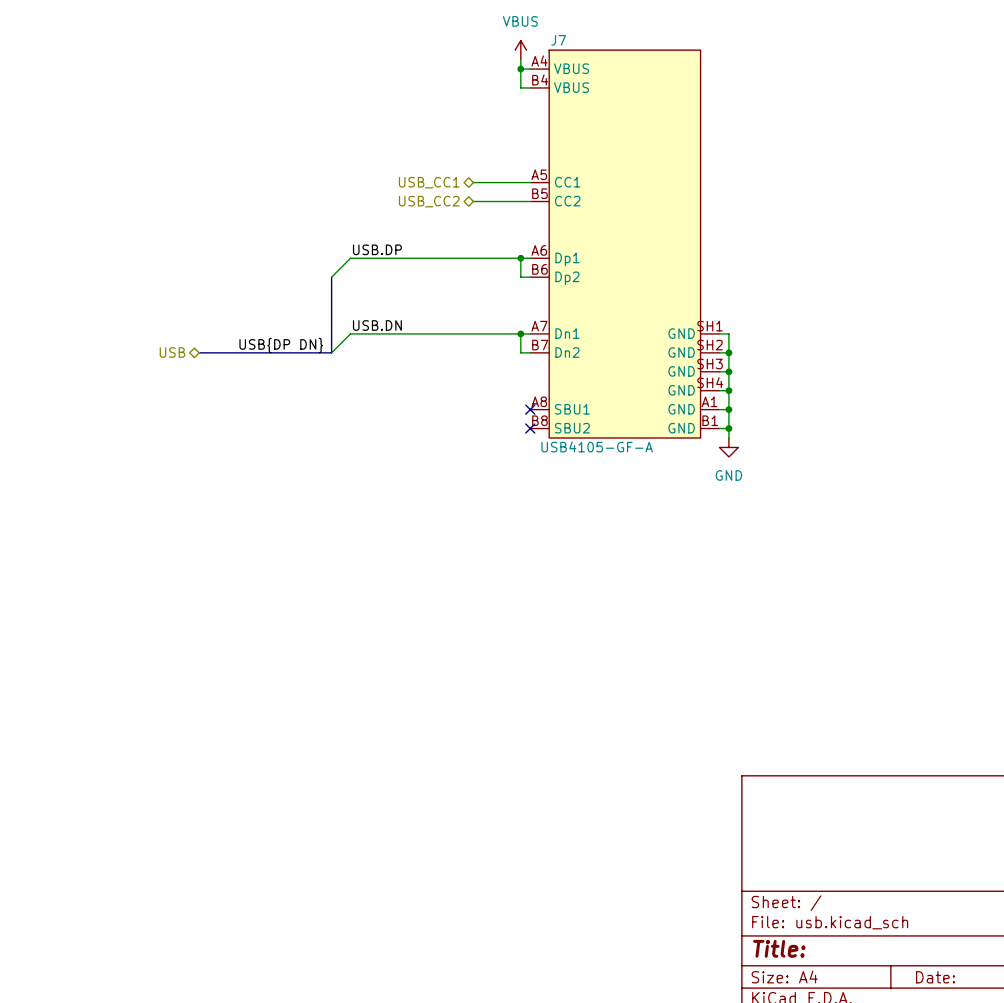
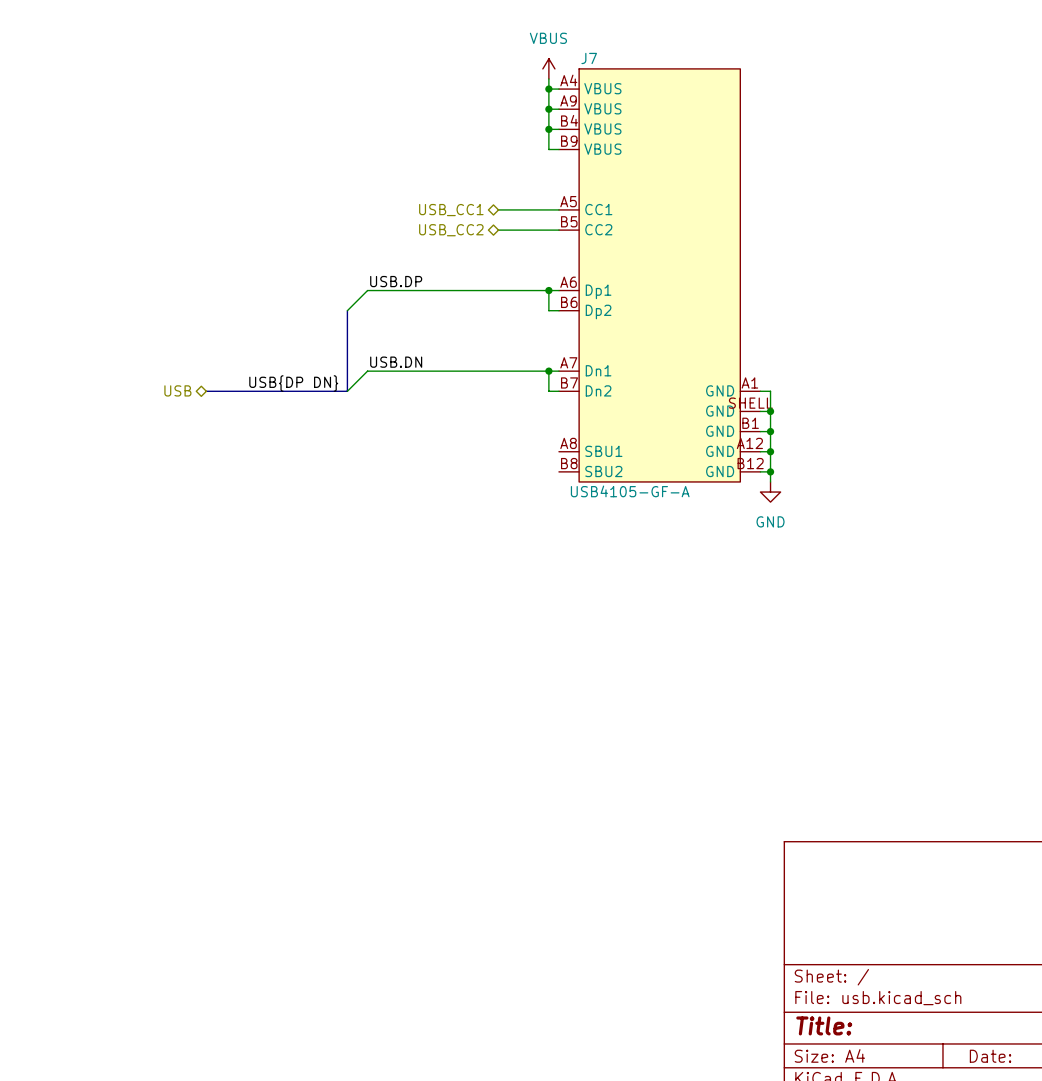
J7 symbol: [530, 50, 720, 439] -> [558, 68, 761, 482]
wire: none -> (548, 109) (548, 149) (558, 149)
junction: none -> (548, 109)
wire: none -> (548, 129) (558, 129)
junction: none -> (548, 129)
wire: (719, 333) (728, 333) (728, 352) -> none
junction: (728, 352) -> none
no-connect mark: (530, 409) -> none
no-connect mark: (530, 428) -> none

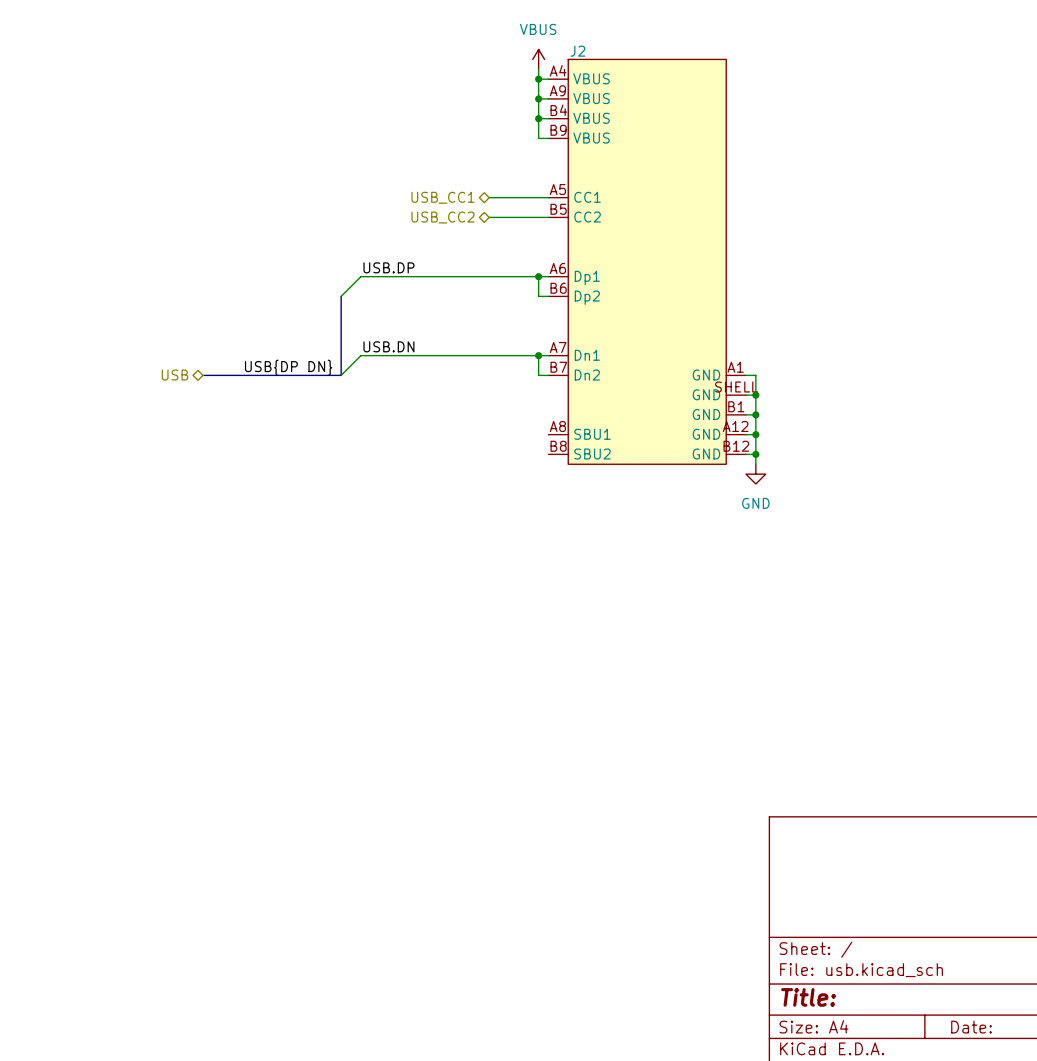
J7 name: J7 (589, 58) -> J2 (577, 51)
J7 value: USB4105-GF-A (630, 491) -> none

